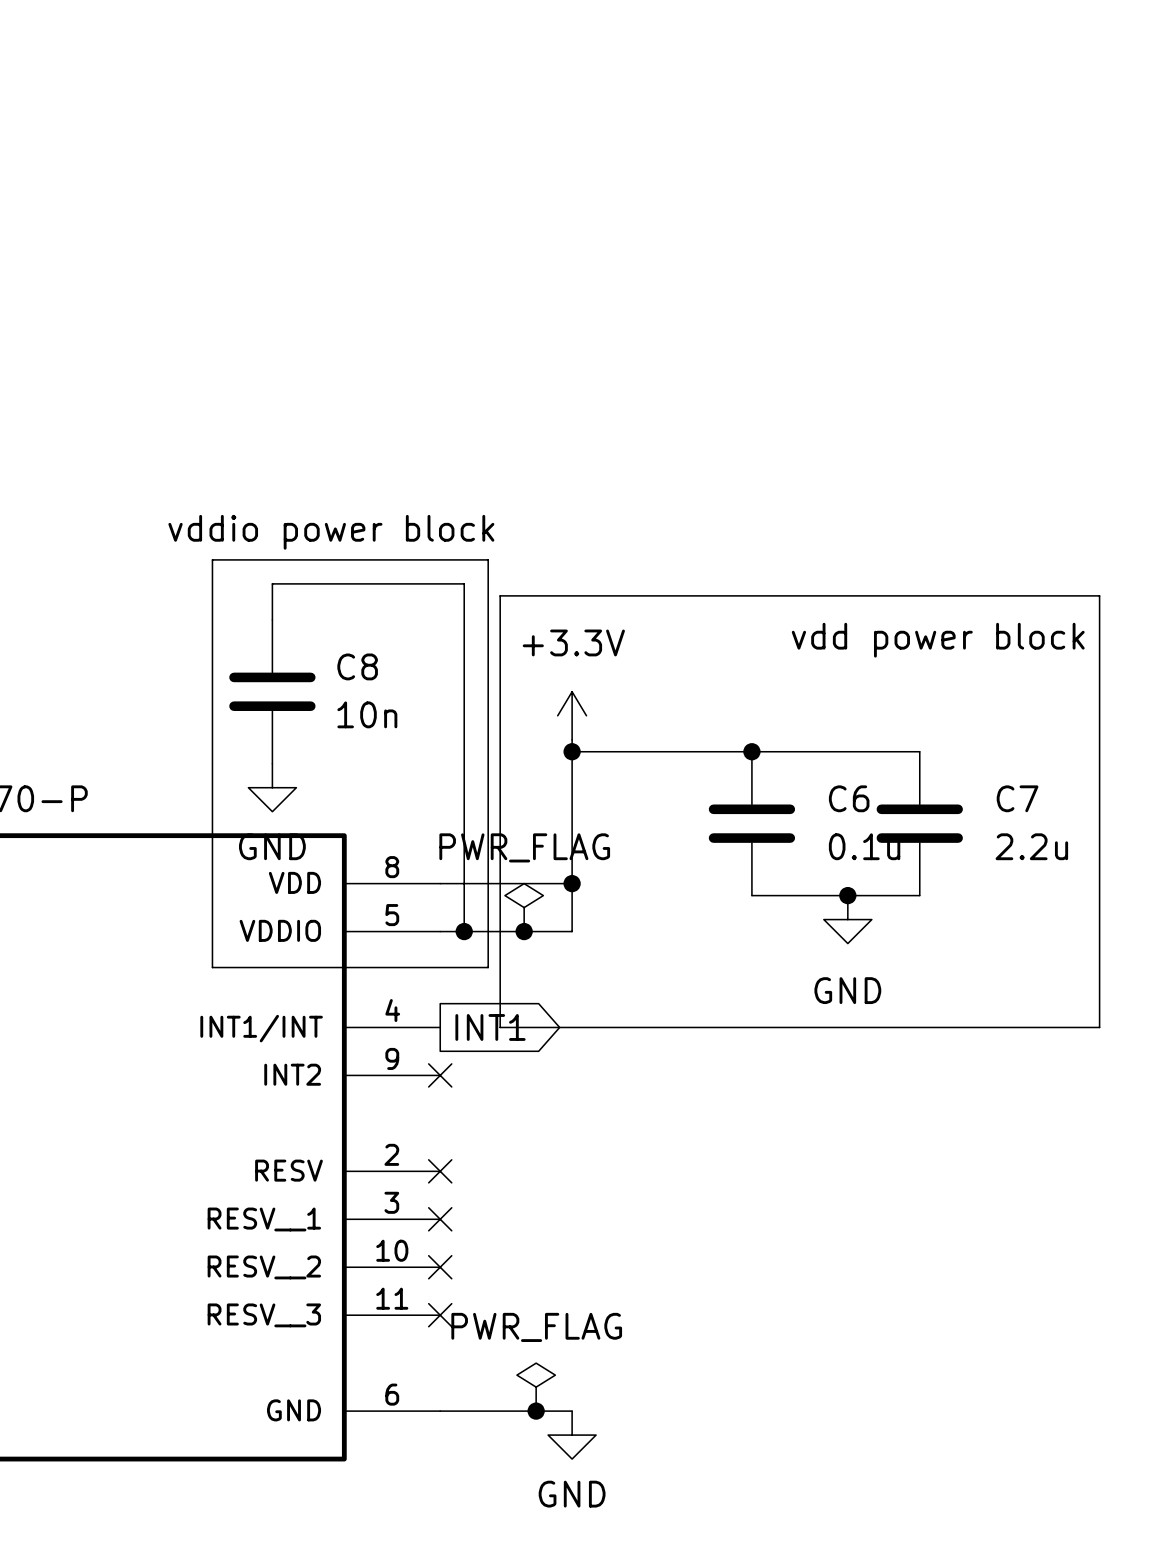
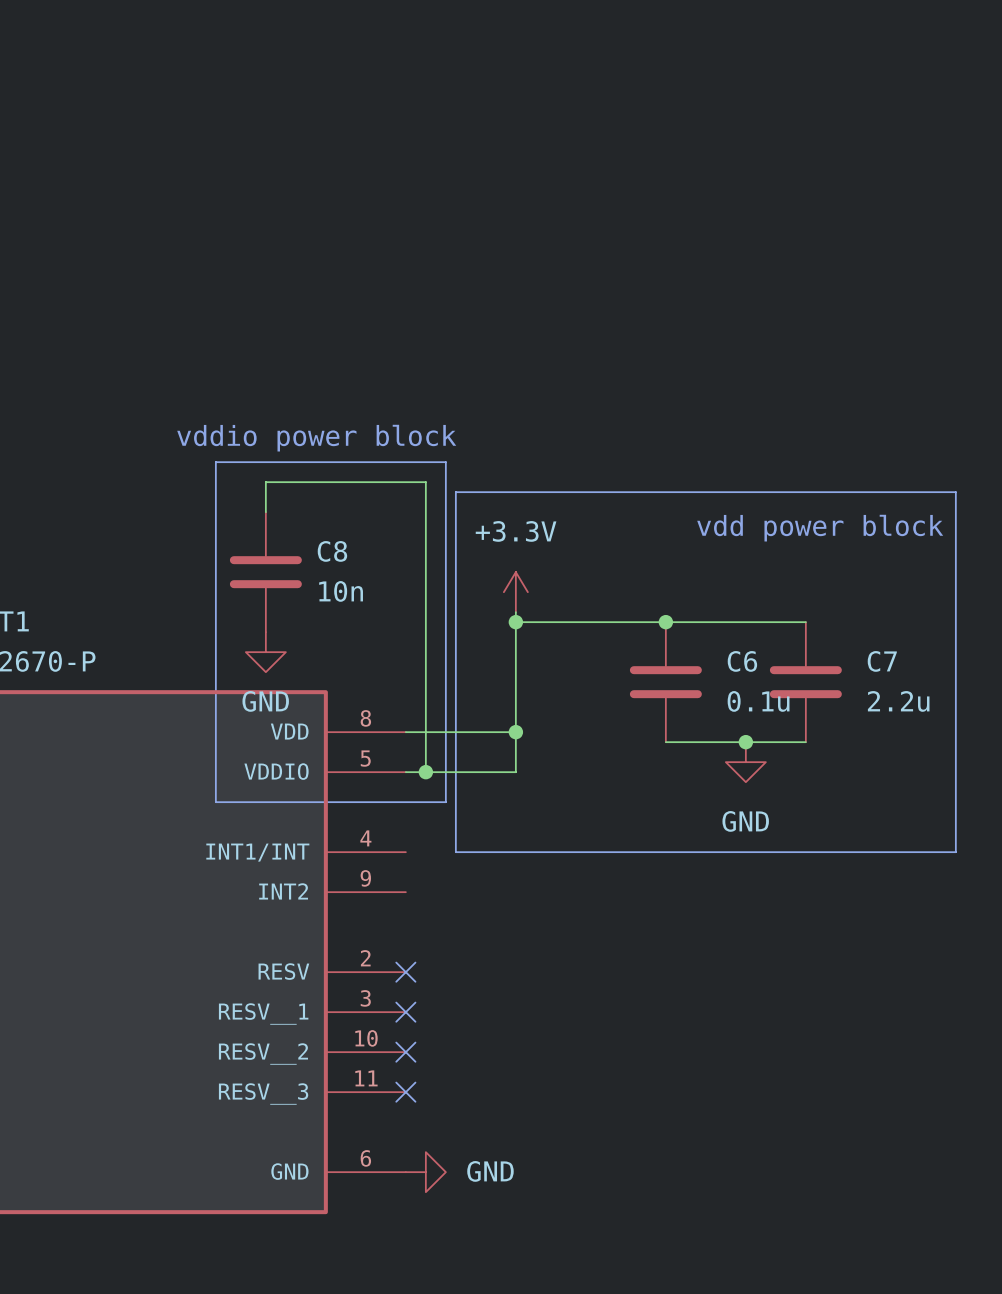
power symbol: PWR_FLAG (524, 907) -> none
junction: (524, 931) -> none
global label: INT1 (490, 1027) -> none
no-connect mark: (440, 1075) -> none
power symbol: PWR_FLAG (536, 1387) -> none
wire: (440, 1411) (572, 1411) -> none
junction: (536, 1411) -> none
power symbol rotation: 0° (572, 1435) -> 90° counterclockwise (425, 1172)
power symbol position: GND (572, 1435) -> GND (425, 1172)

